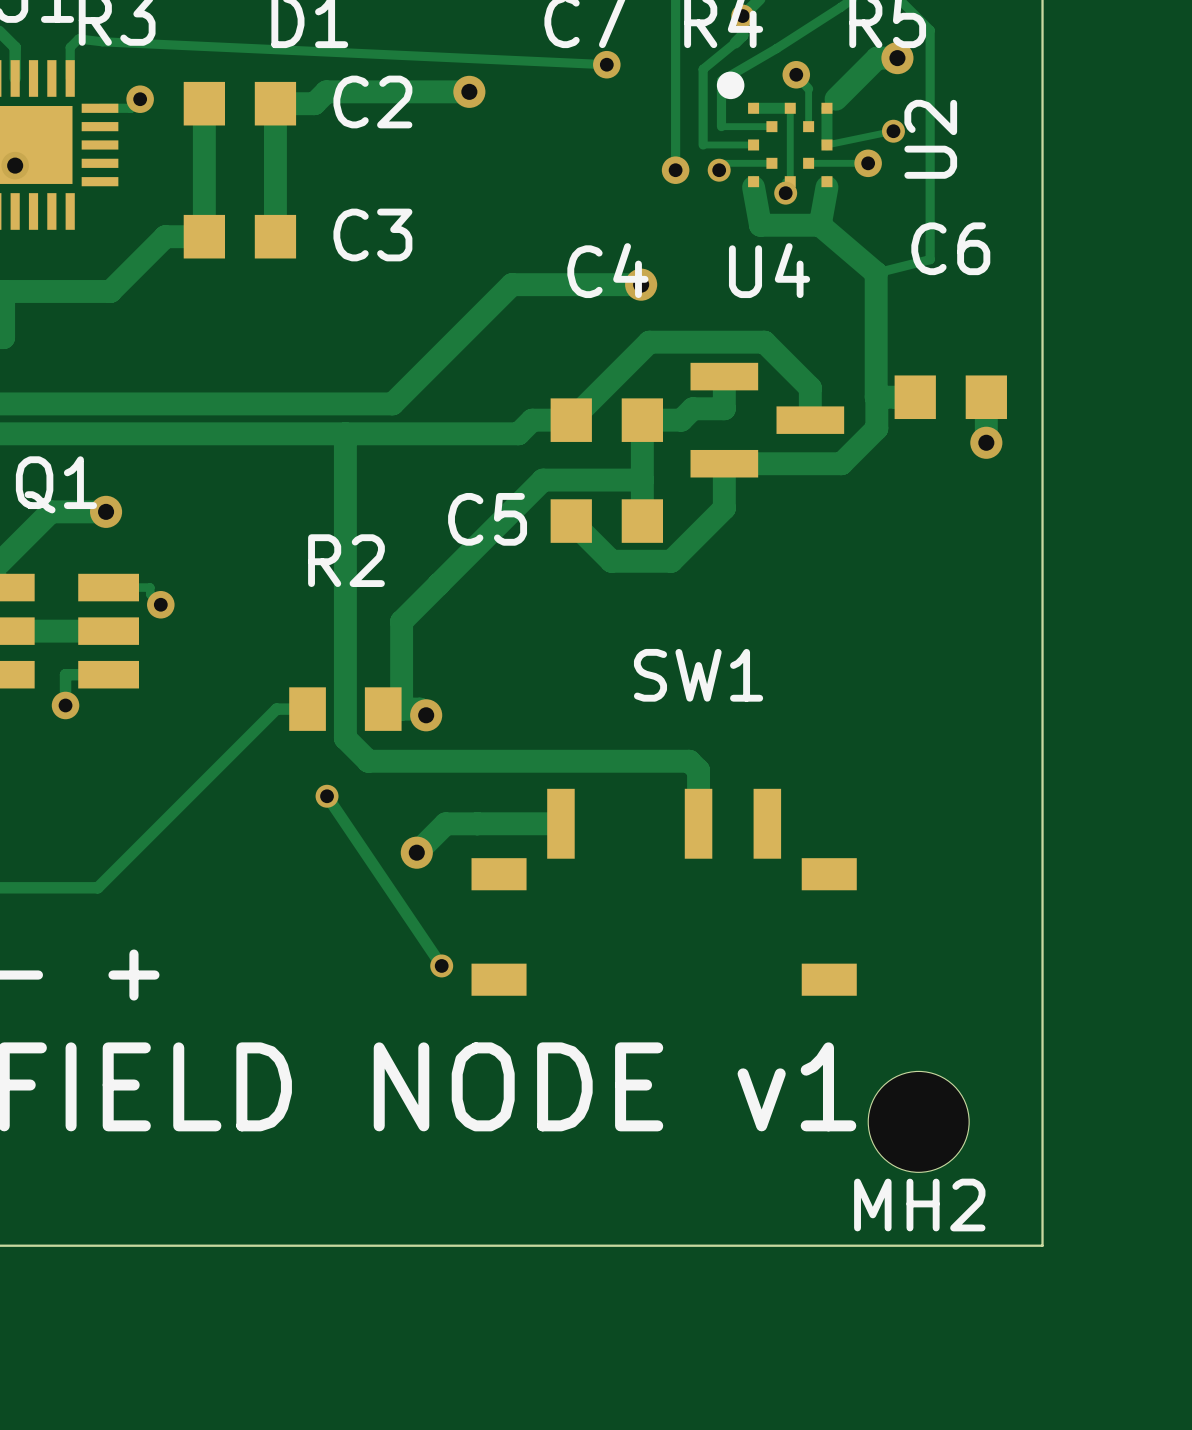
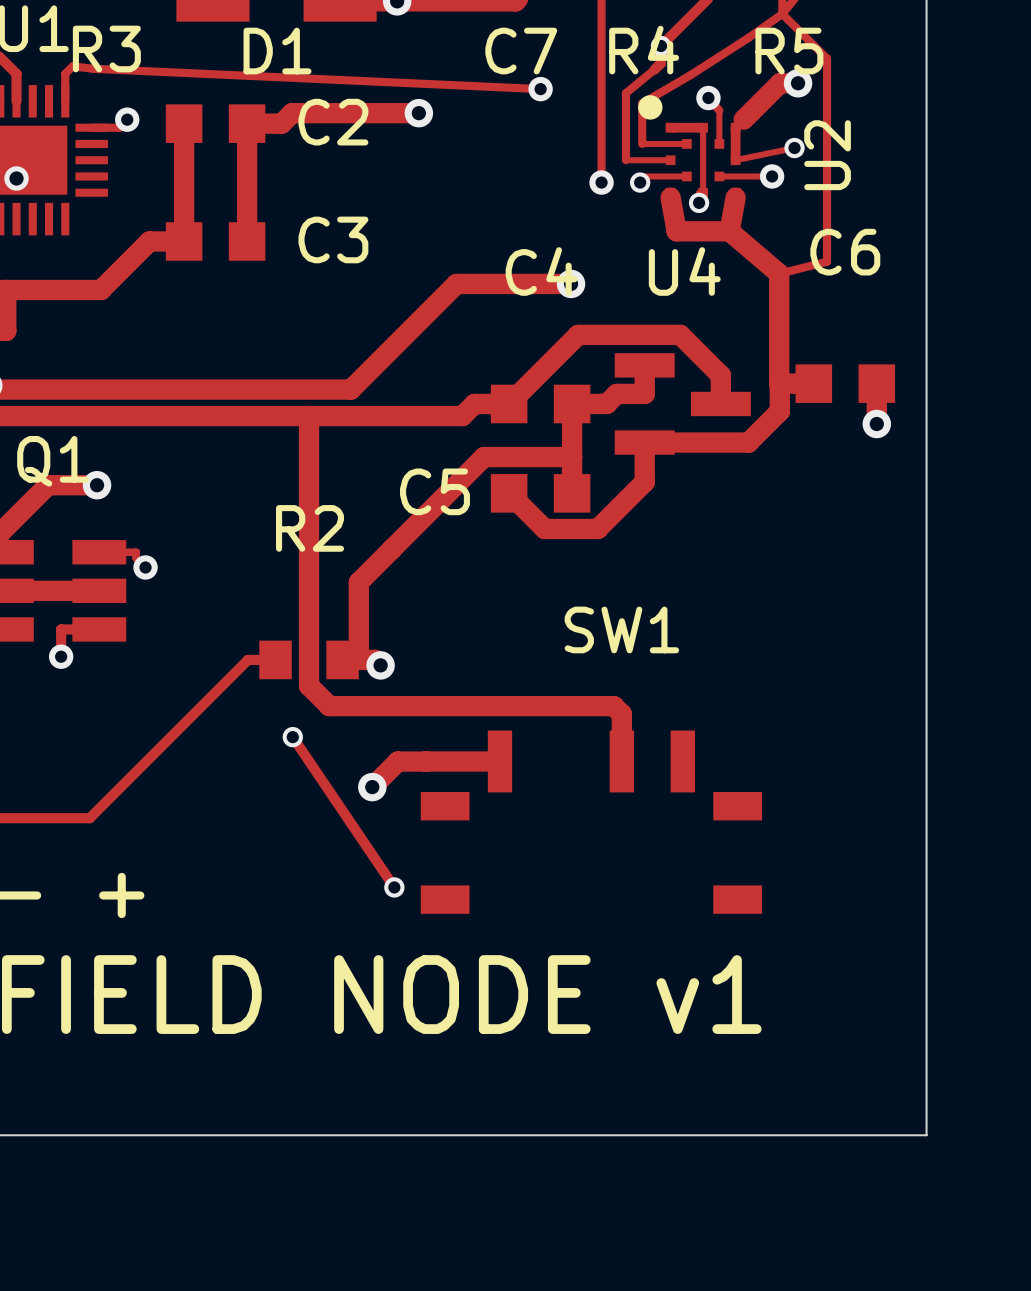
MH2: (918, 1121) -> none

